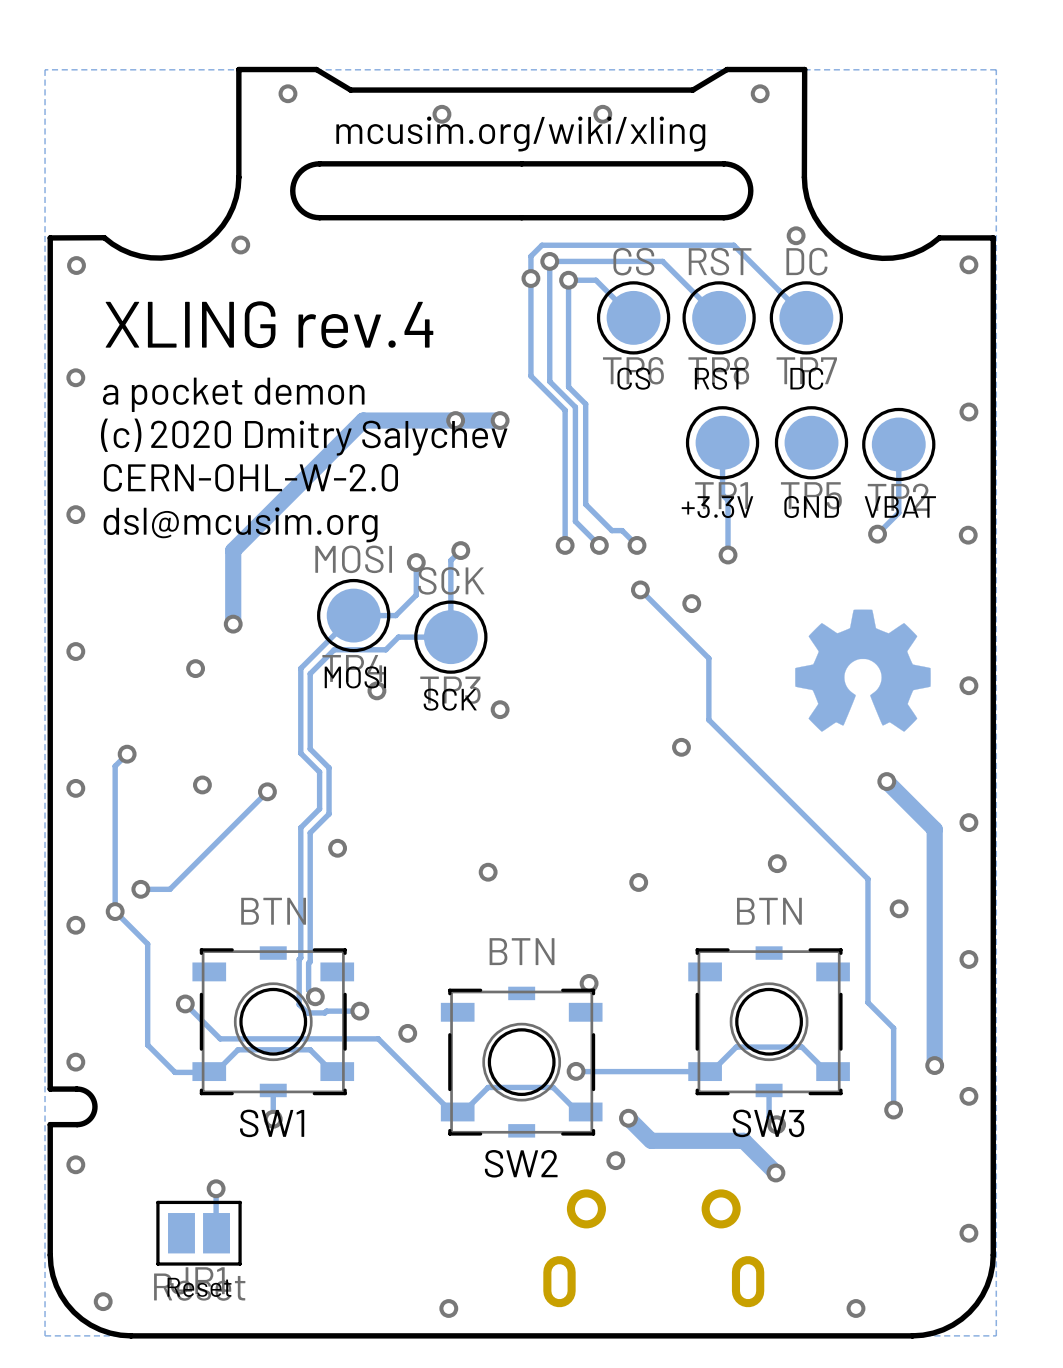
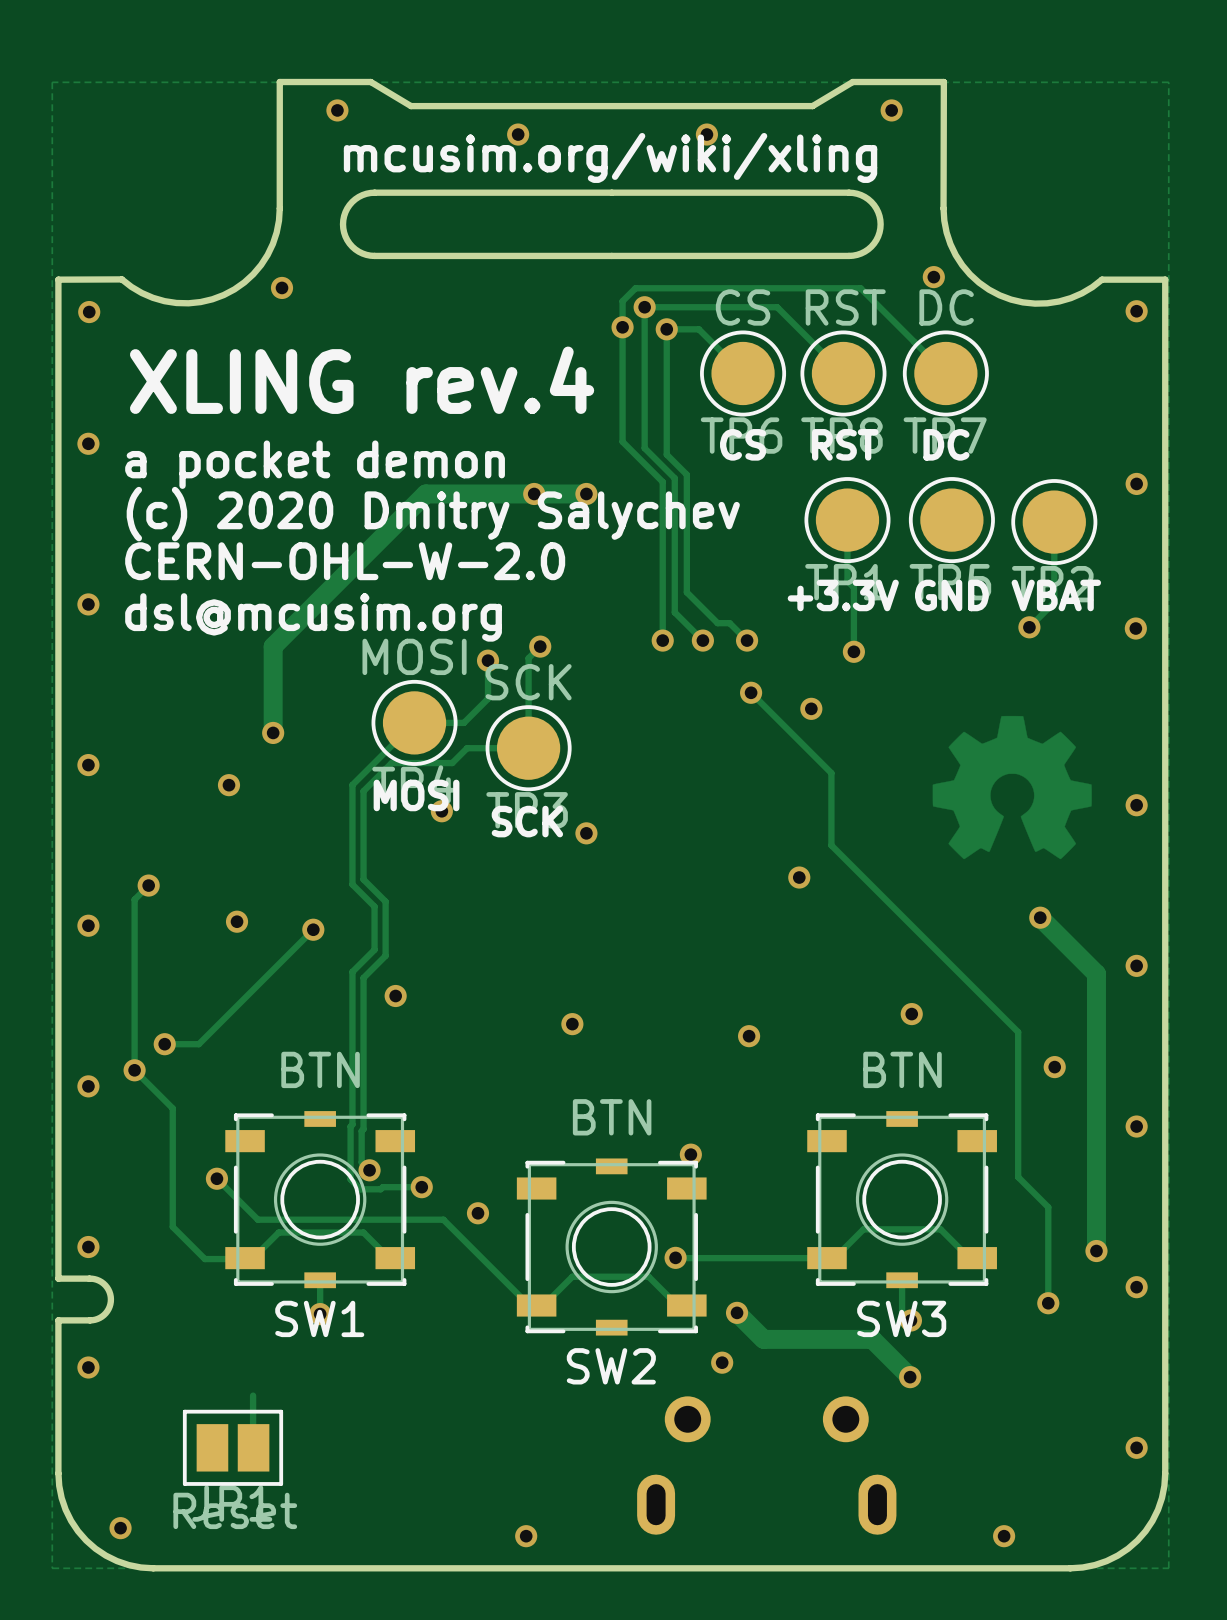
via: (216, 1188) -> none
text: Reset (199, 1287) -> none

